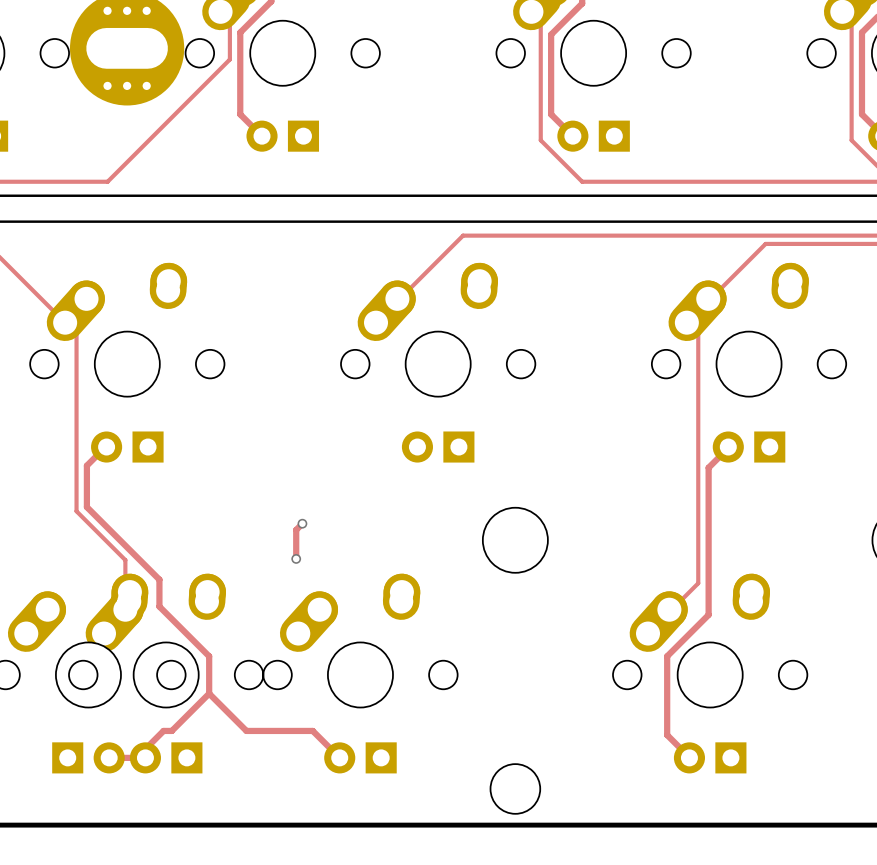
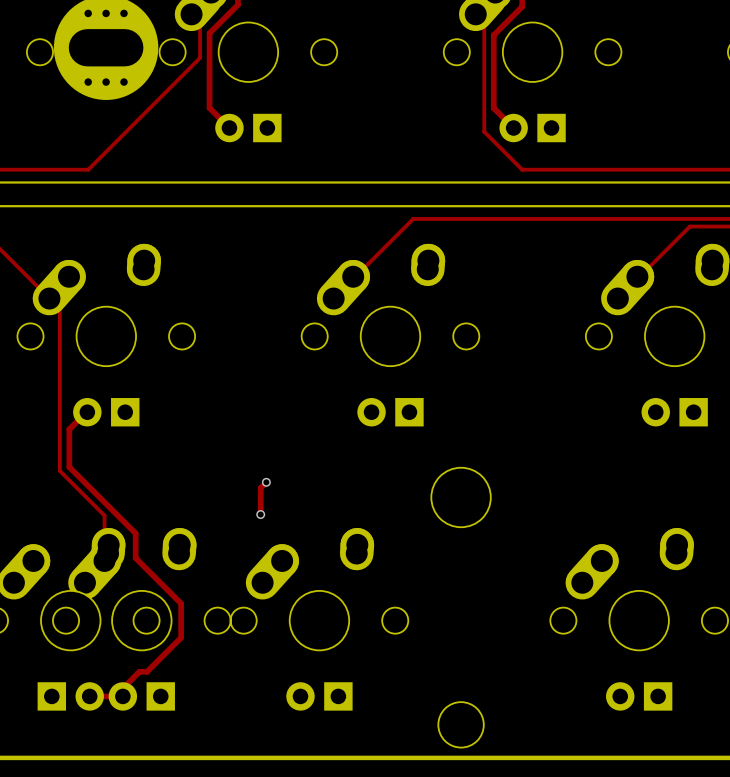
track: (698, 334) (698, 583) (648, 633) -> none
track: (728, 448) (708, 467) (708, 614) (667, 656) (667, 735) (689, 757) -> none
track: (209, 693) (246, 730) (312, 730) (339, 757) -> none

